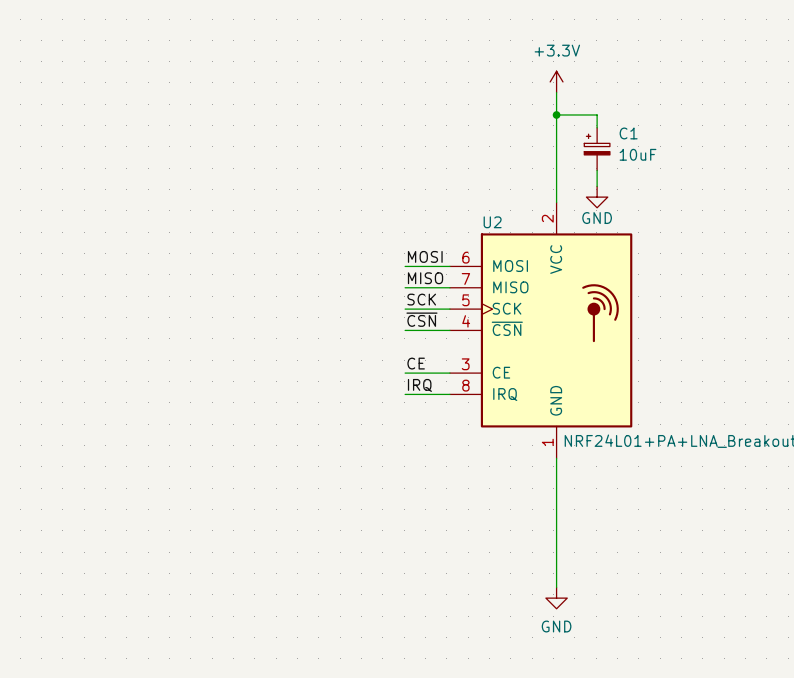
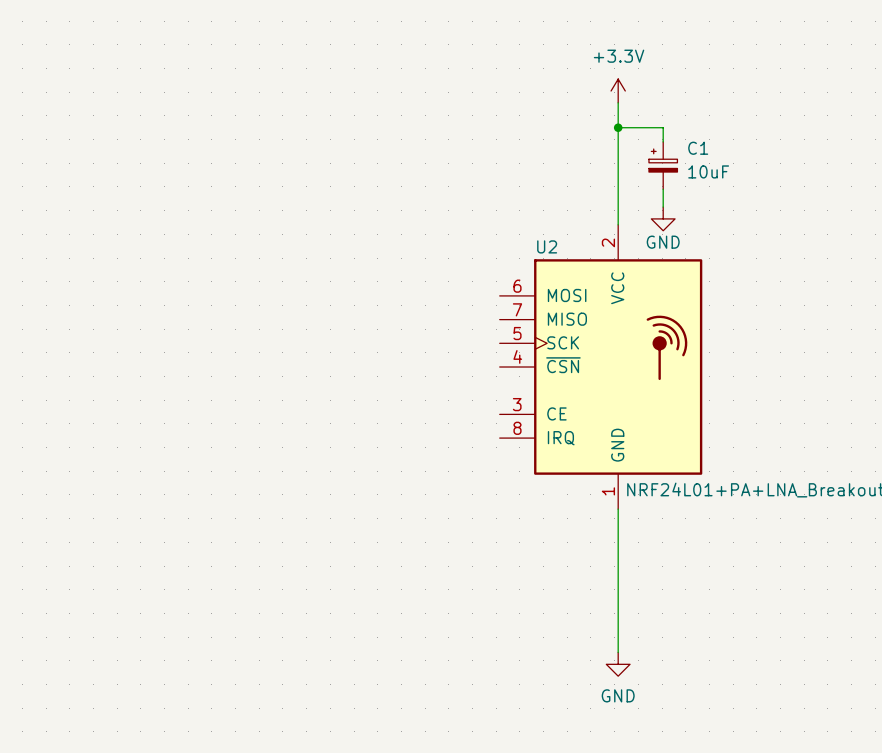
label: MOSI (425, 256) -> none
wire: (405, 266) (449, 266) -> none
label: MISO (425, 278) -> none
wire: (405, 287) (449, 287) -> none
label: SCK (421, 299) -> none
wire: (405, 309) (449, 309) -> none
label: ~{CSN} (421, 319) -> none
wire: (405, 330) (449, 330) -> none
label: CE (416, 363) -> none
wire: (405, 373) (449, 373) -> none
label: IRQ (419, 385) -> none
wire: (405, 394) (449, 394) -> none

